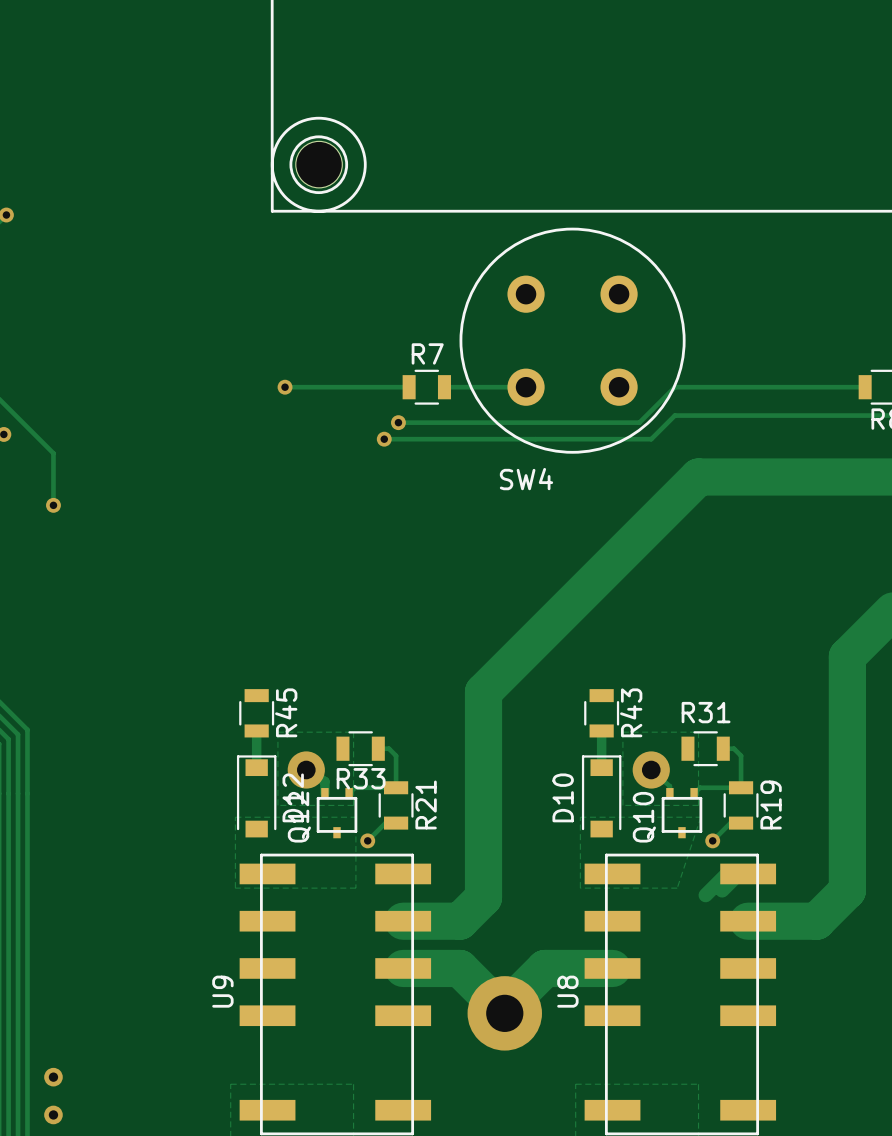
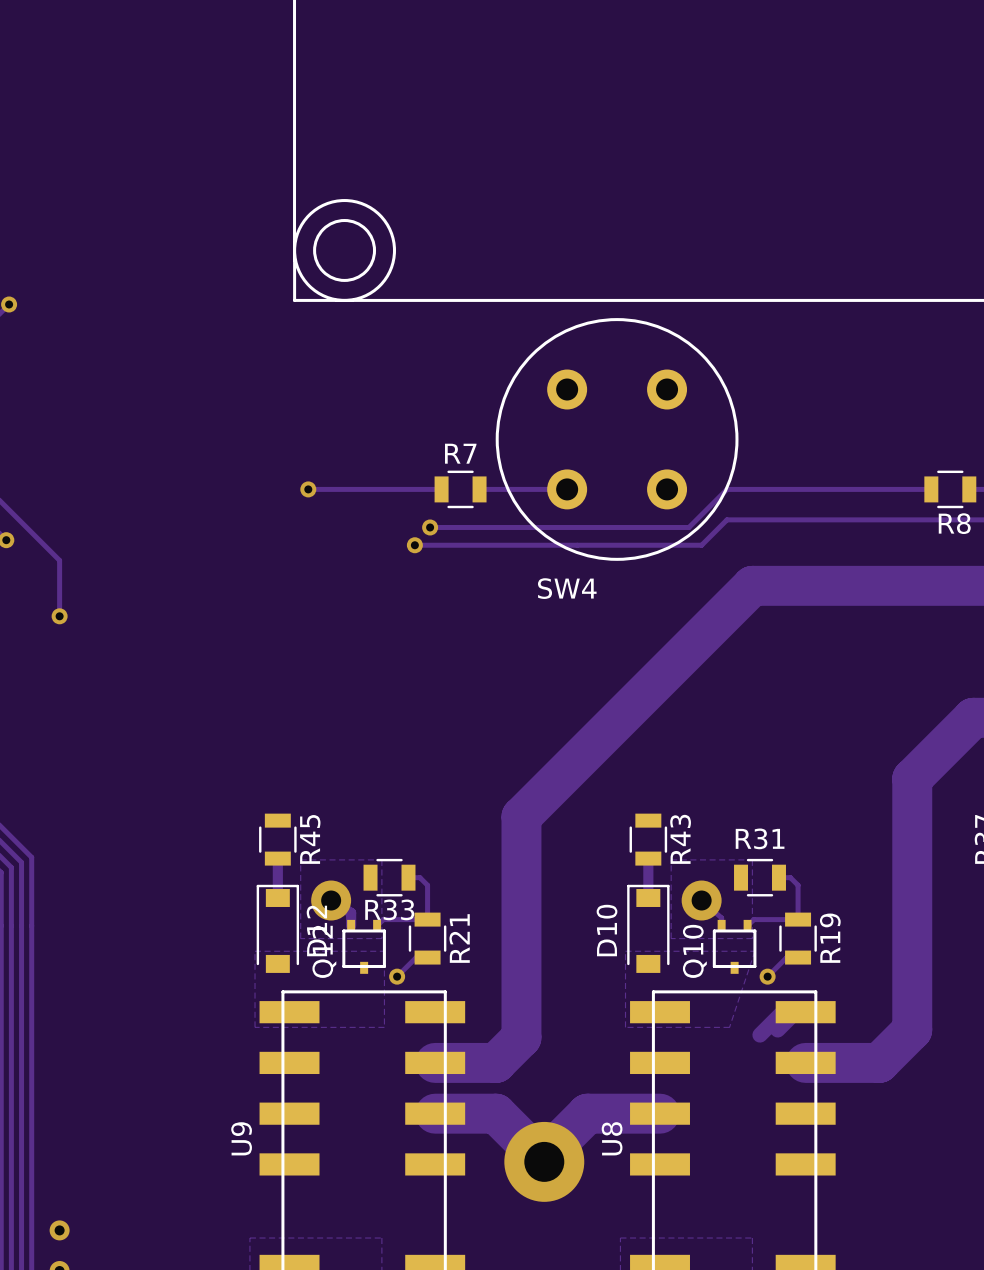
part: (319, 164) -> none

